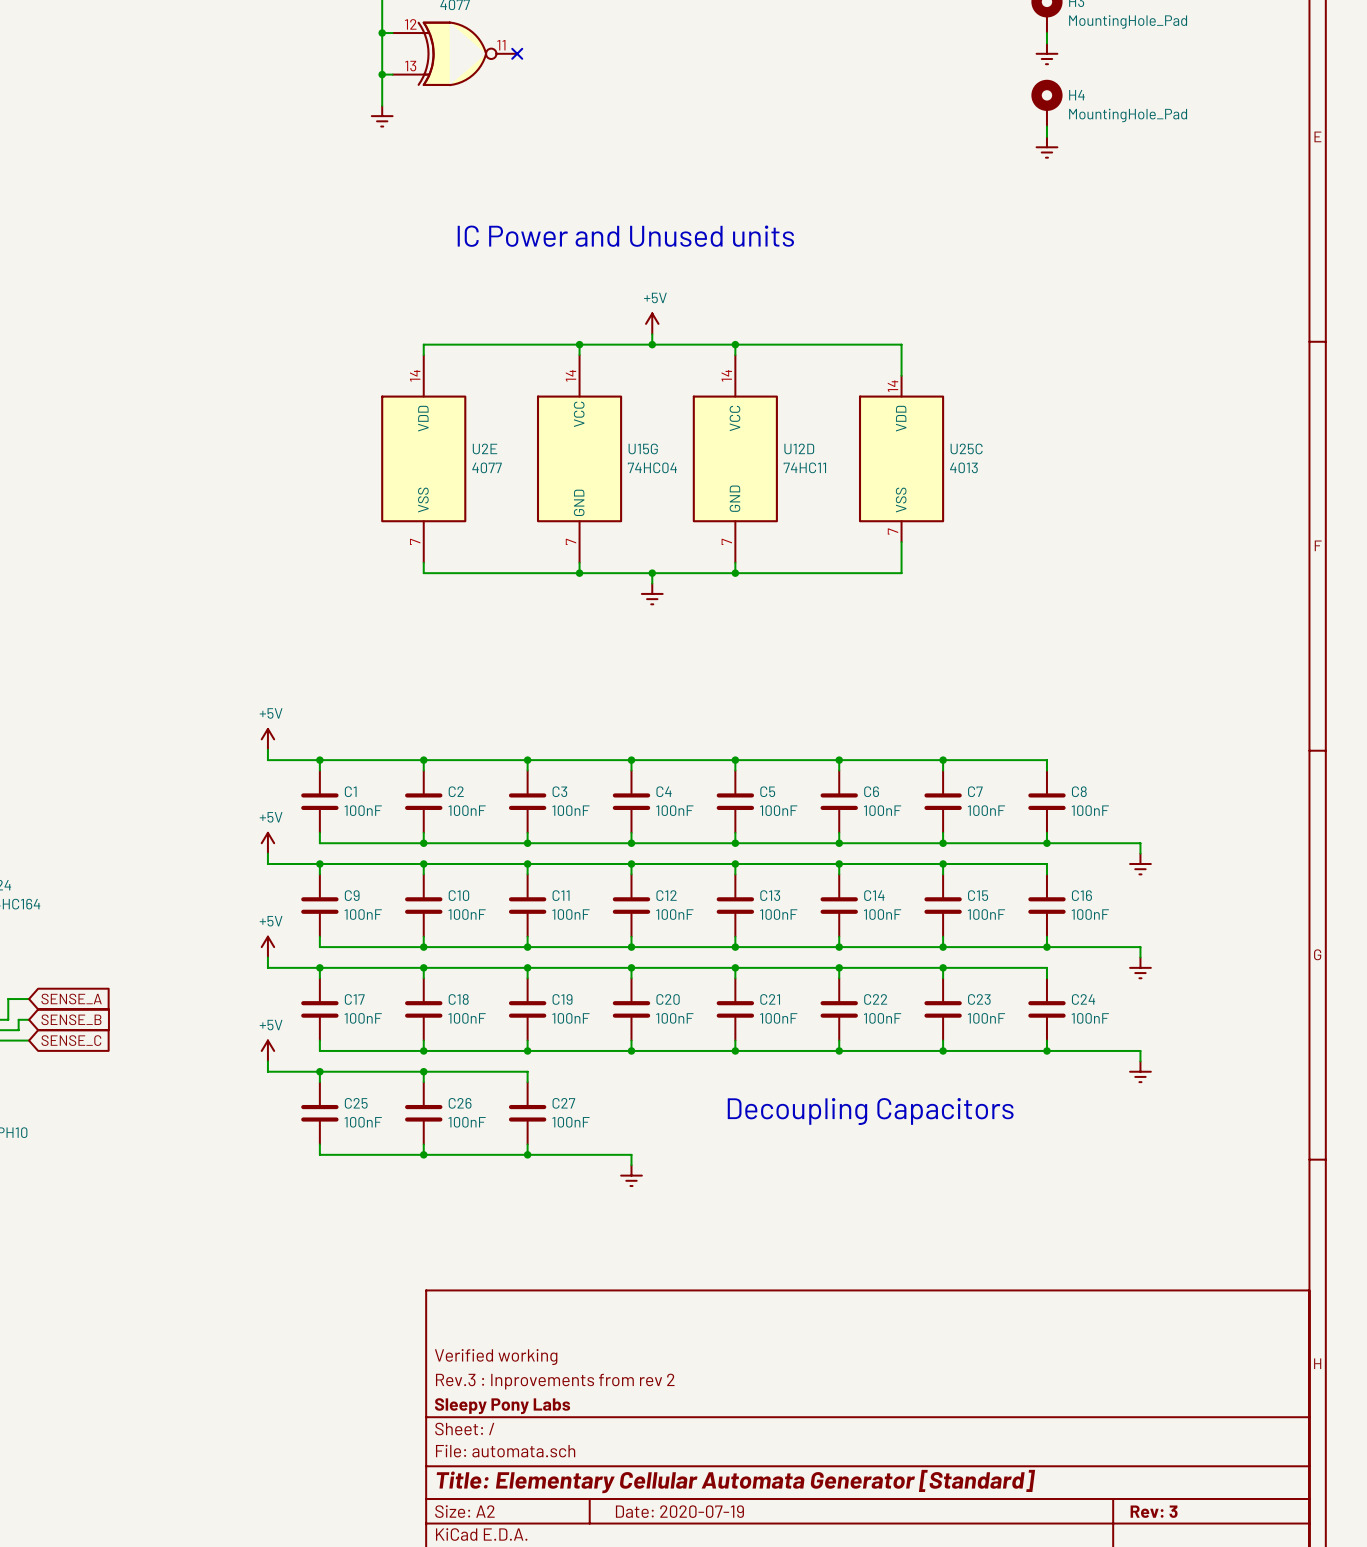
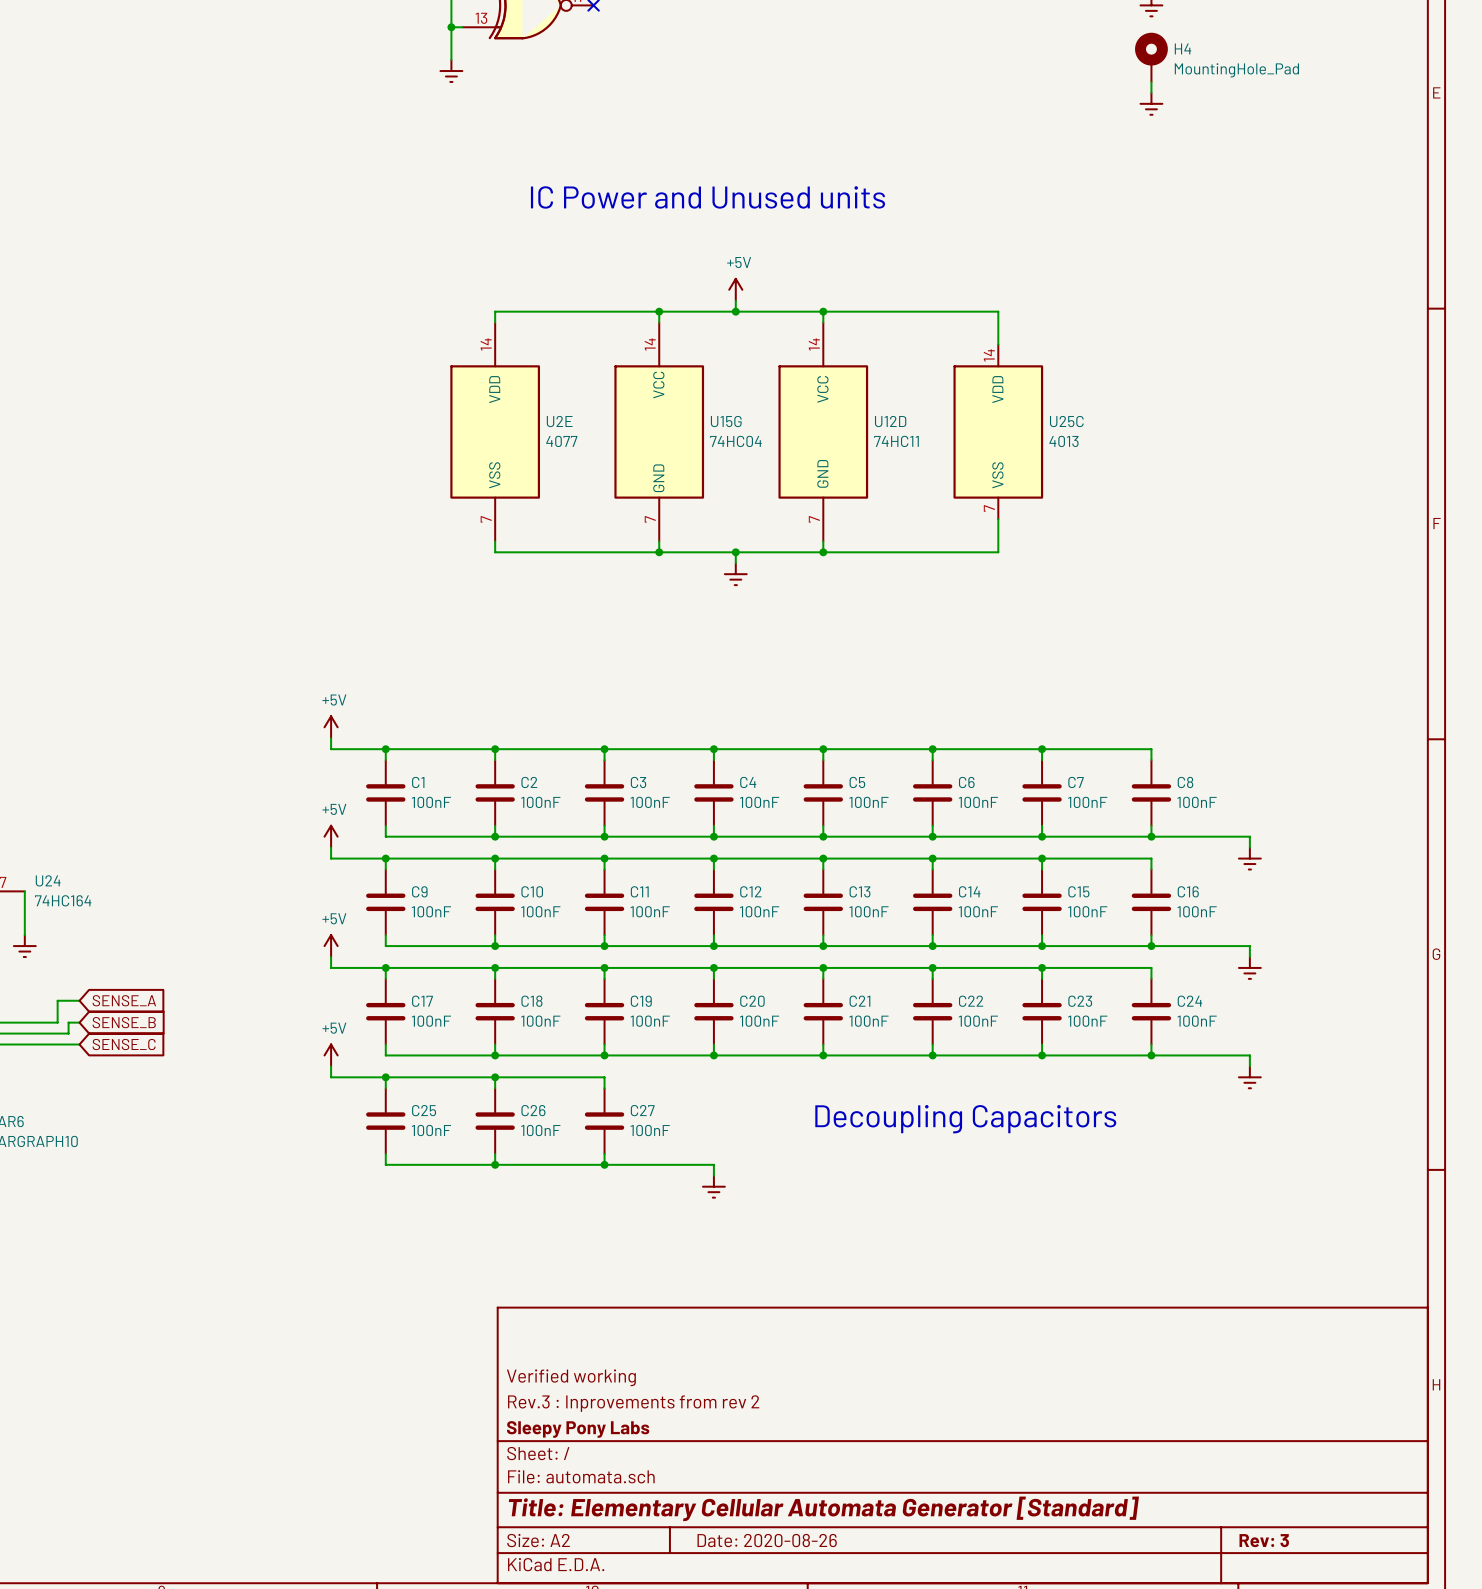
title block: Date: 2020-07-19 (679, 1511) -> Date: 2020-08-26 (767, 1540)

